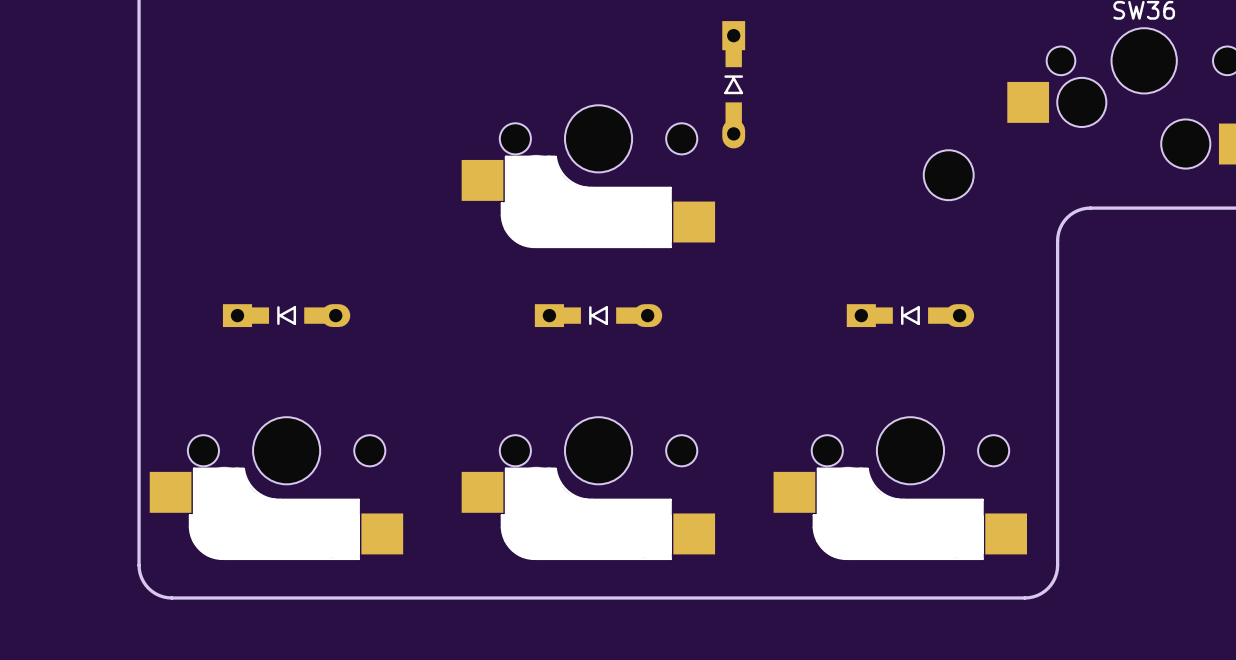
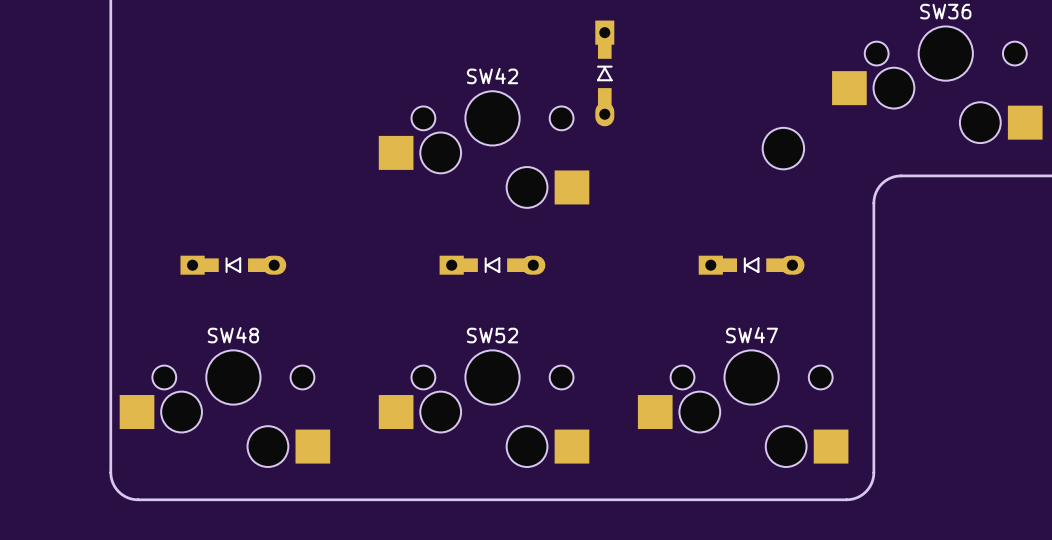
part: (588, 176) -> none
SW42: none -> (484, 149)
part: (276, 488) -> none
SW48: none -> (224, 408)
part: (588, 488) -> none
SW52: none -> (484, 408)
part: (900, 488) -> none
SW47: none -> (743, 408)

